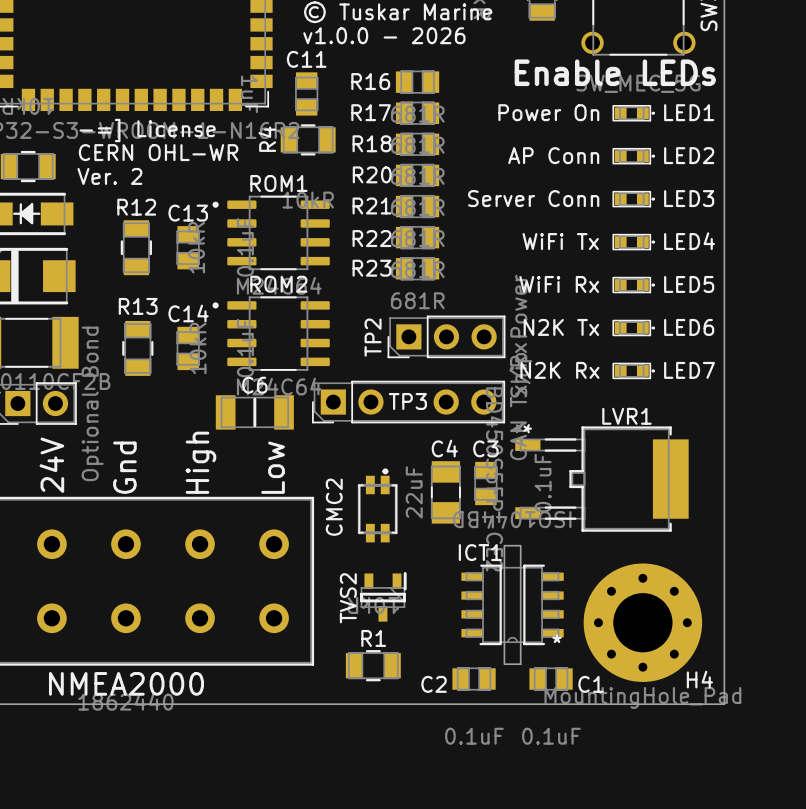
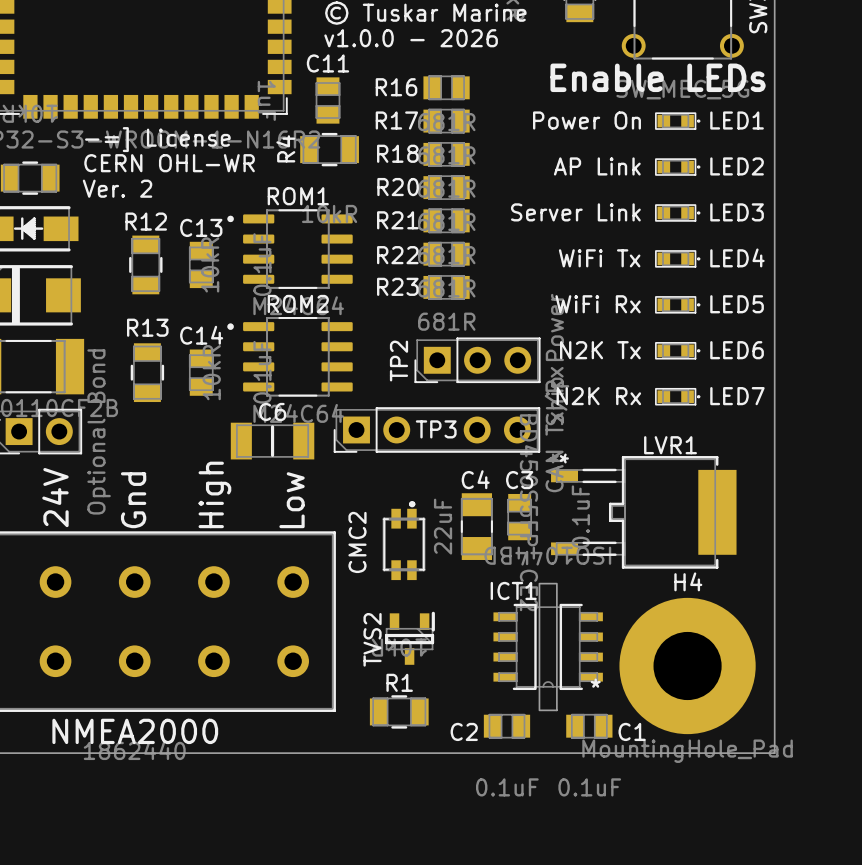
text: AP Conn (553, 155) -> AP Link (597, 166)
text: Server Conn (533, 198) -> Server Link (575, 212)
H4 footprint: [583, 563, 703, 682] -> [619, 597, 756, 735]
H4 name position: H4 (699, 679) -> H4 (688, 581)

